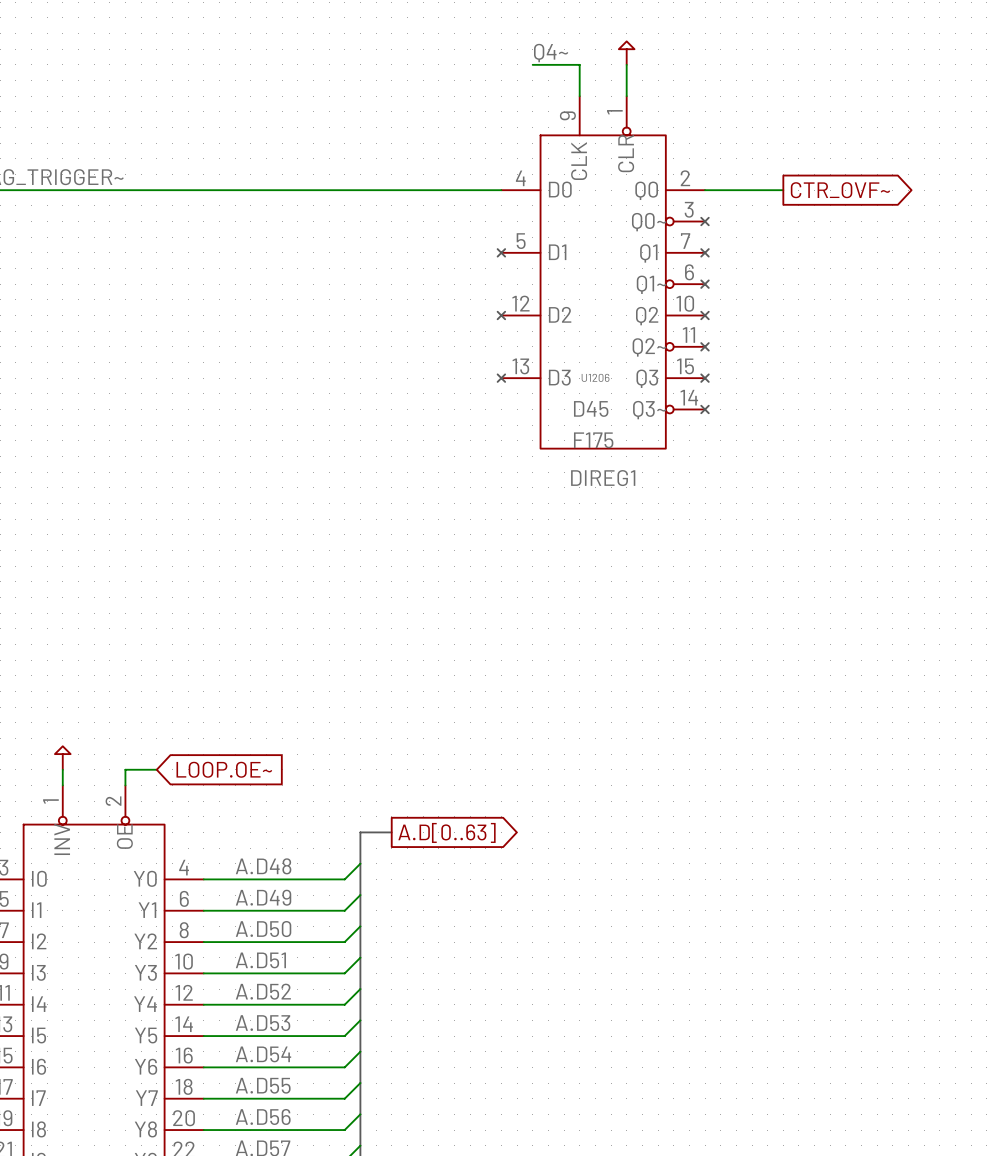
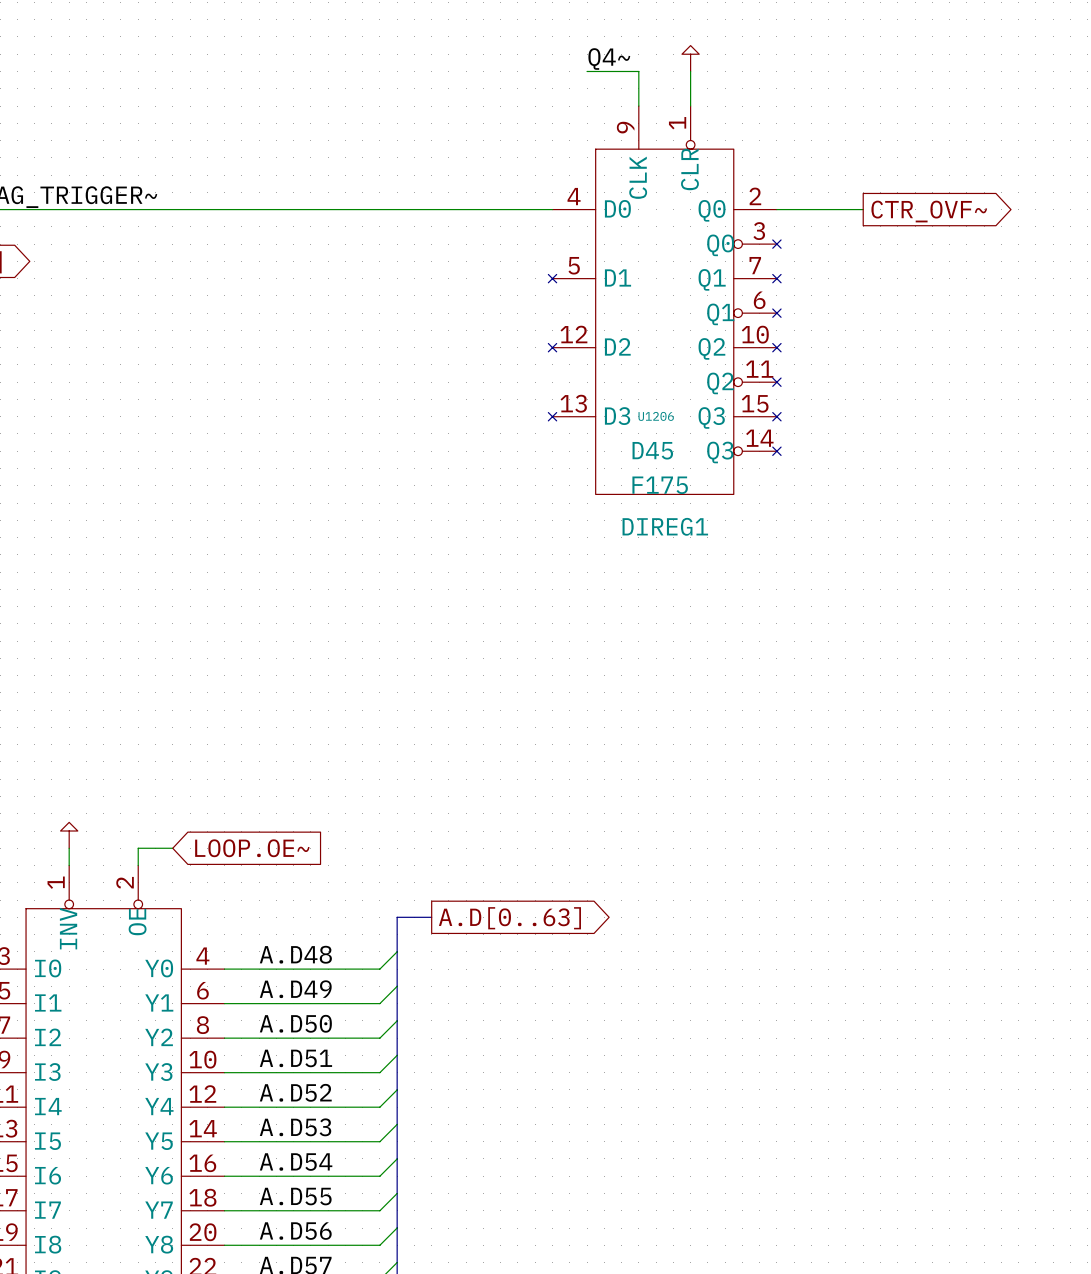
U1206 pin name: Q0~ (649, 222) -> Q0 (720, 245)
U1206 pin name: Q1~ (651, 284) -> Q1 (720, 314)
U1206 pin name: Q2~ (649, 347) -> Q2 (720, 383)
U1206 pin name: Q3~ (649, 410) -> Q3 (720, 452)

